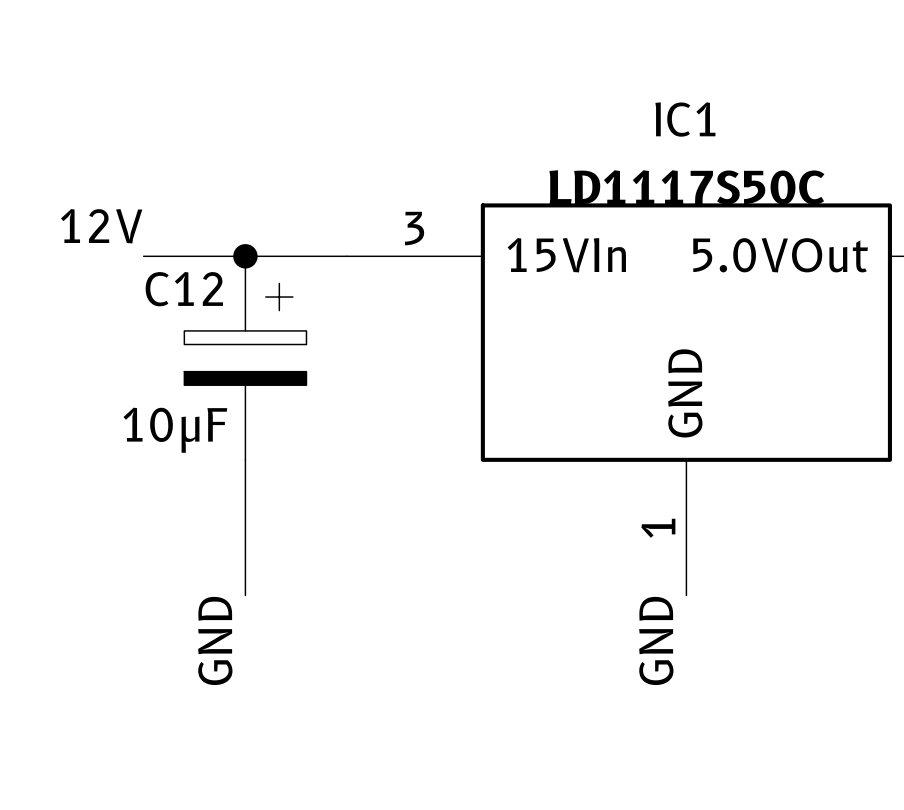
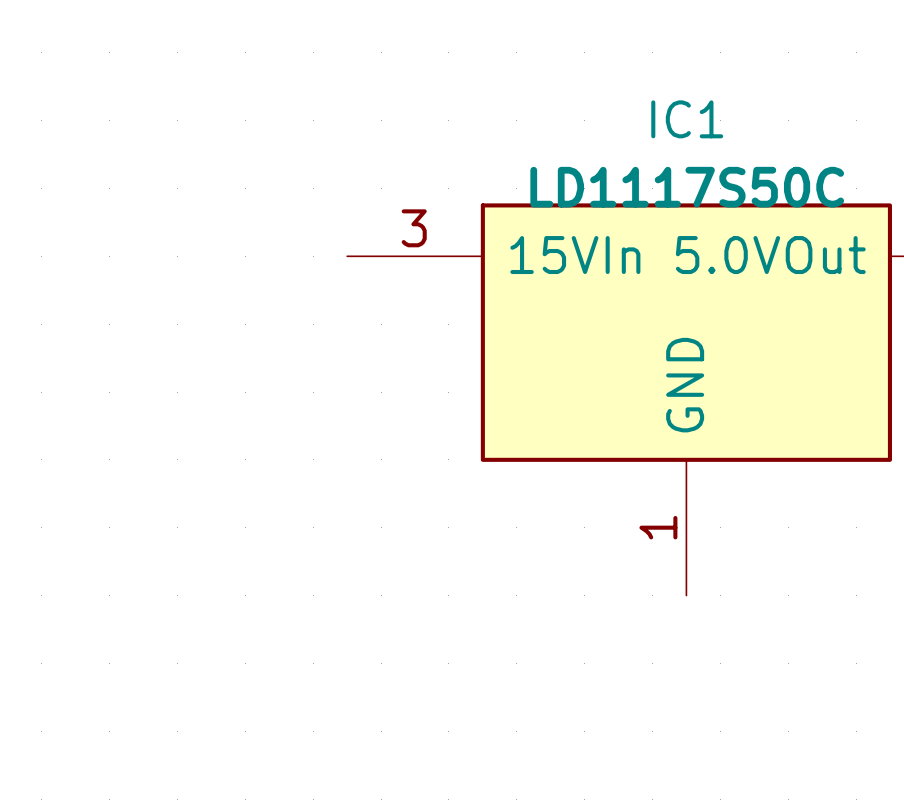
label: 12V (101, 226) -> none
wire: (143, 256) (347, 256) -> none
junction: (245, 256) -> none
C12: 10μF (245, 358) -> none
wire: (245, 459) (245, 595) -> none
label: GND (215, 640) -> none
label: GND (656, 640) -> none

